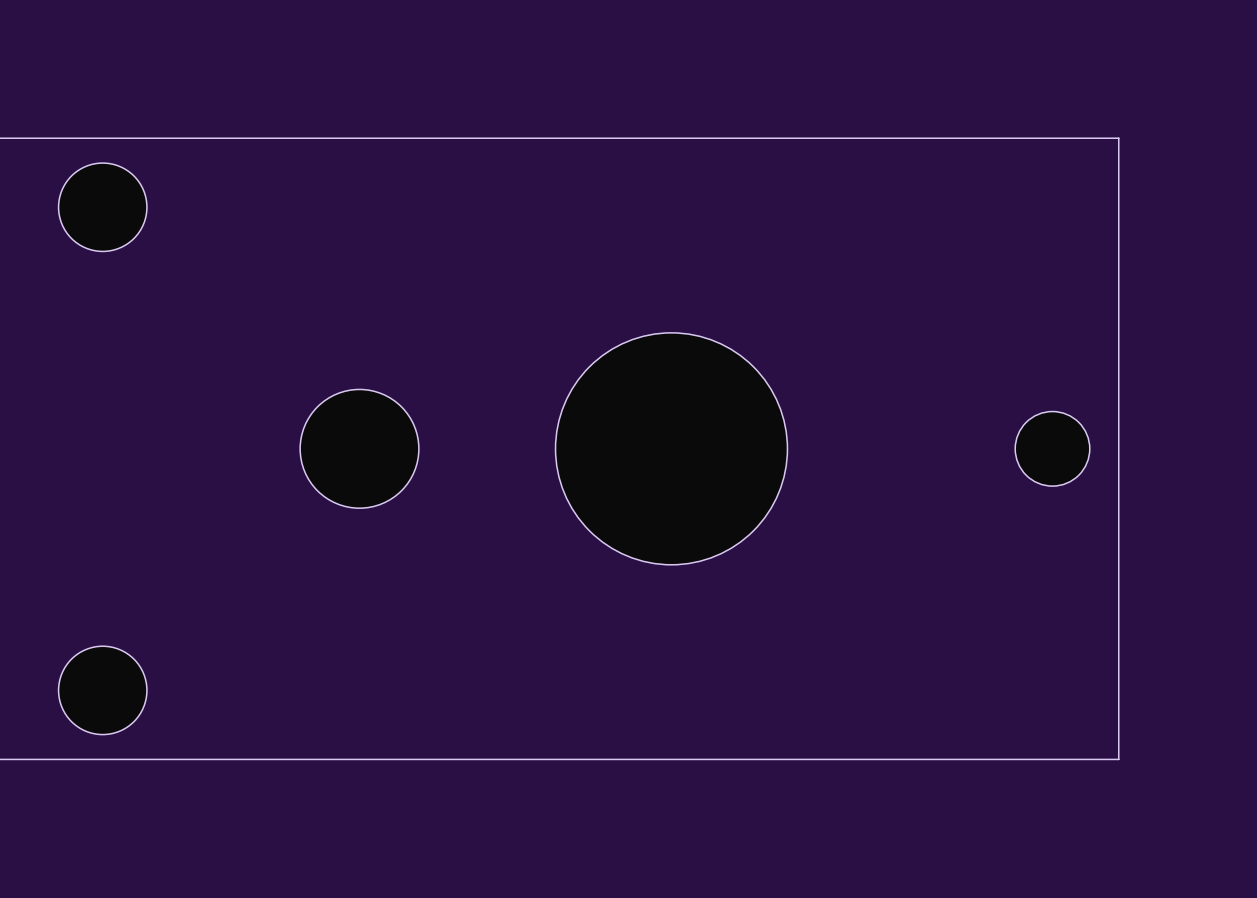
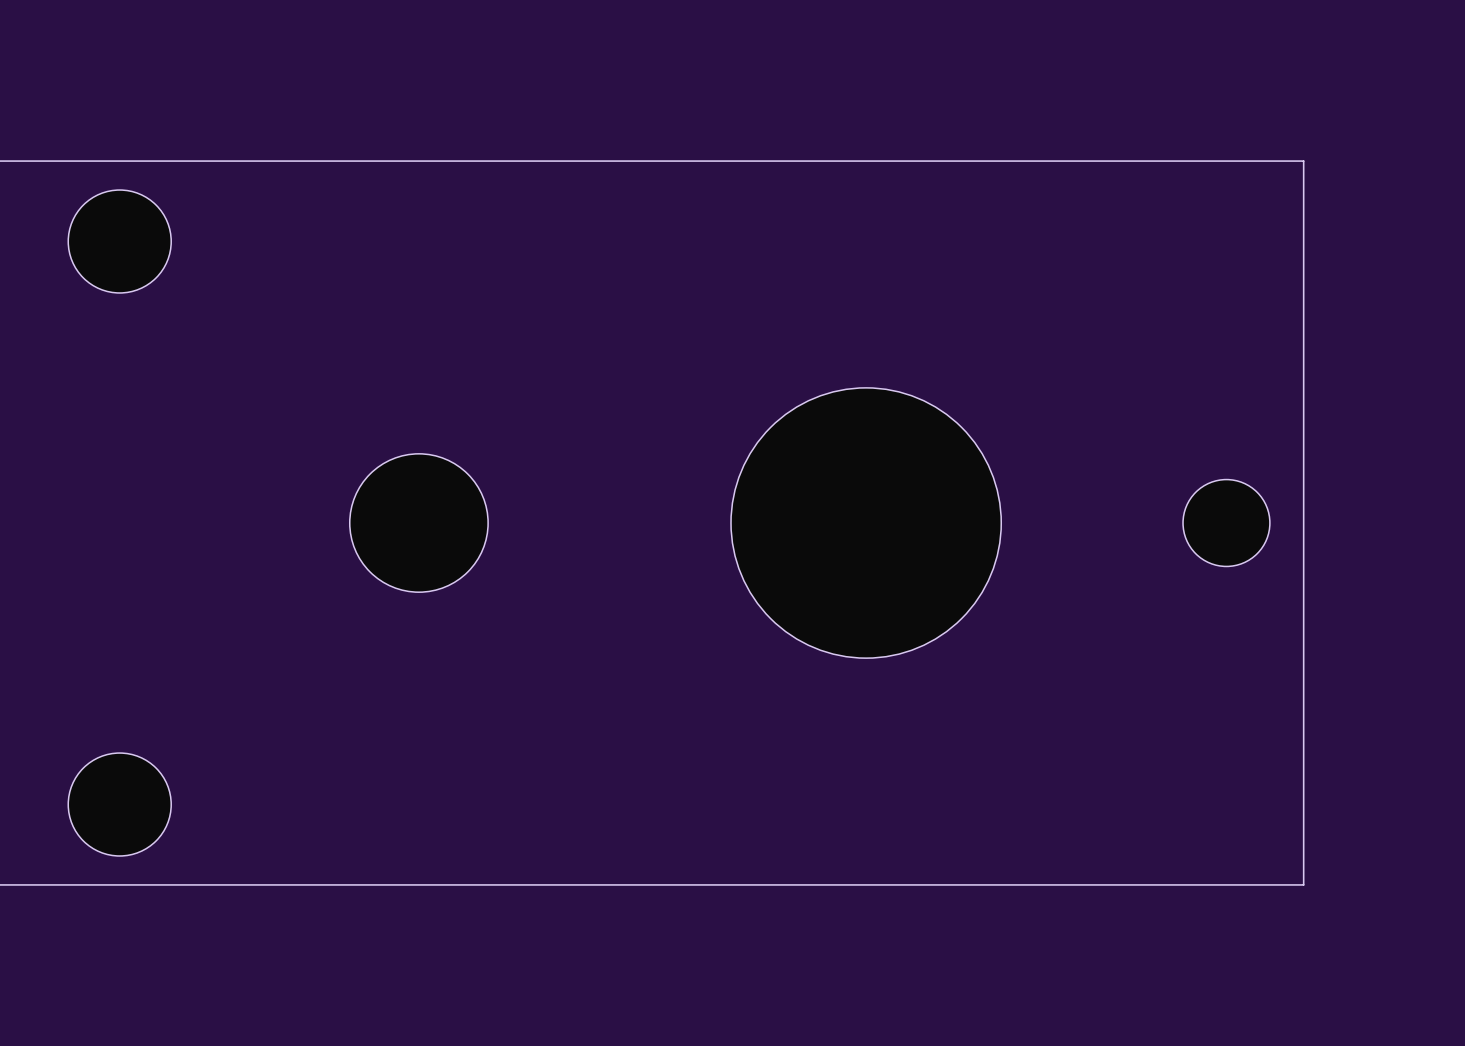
part position: (671, 448) -> (866, 523)

